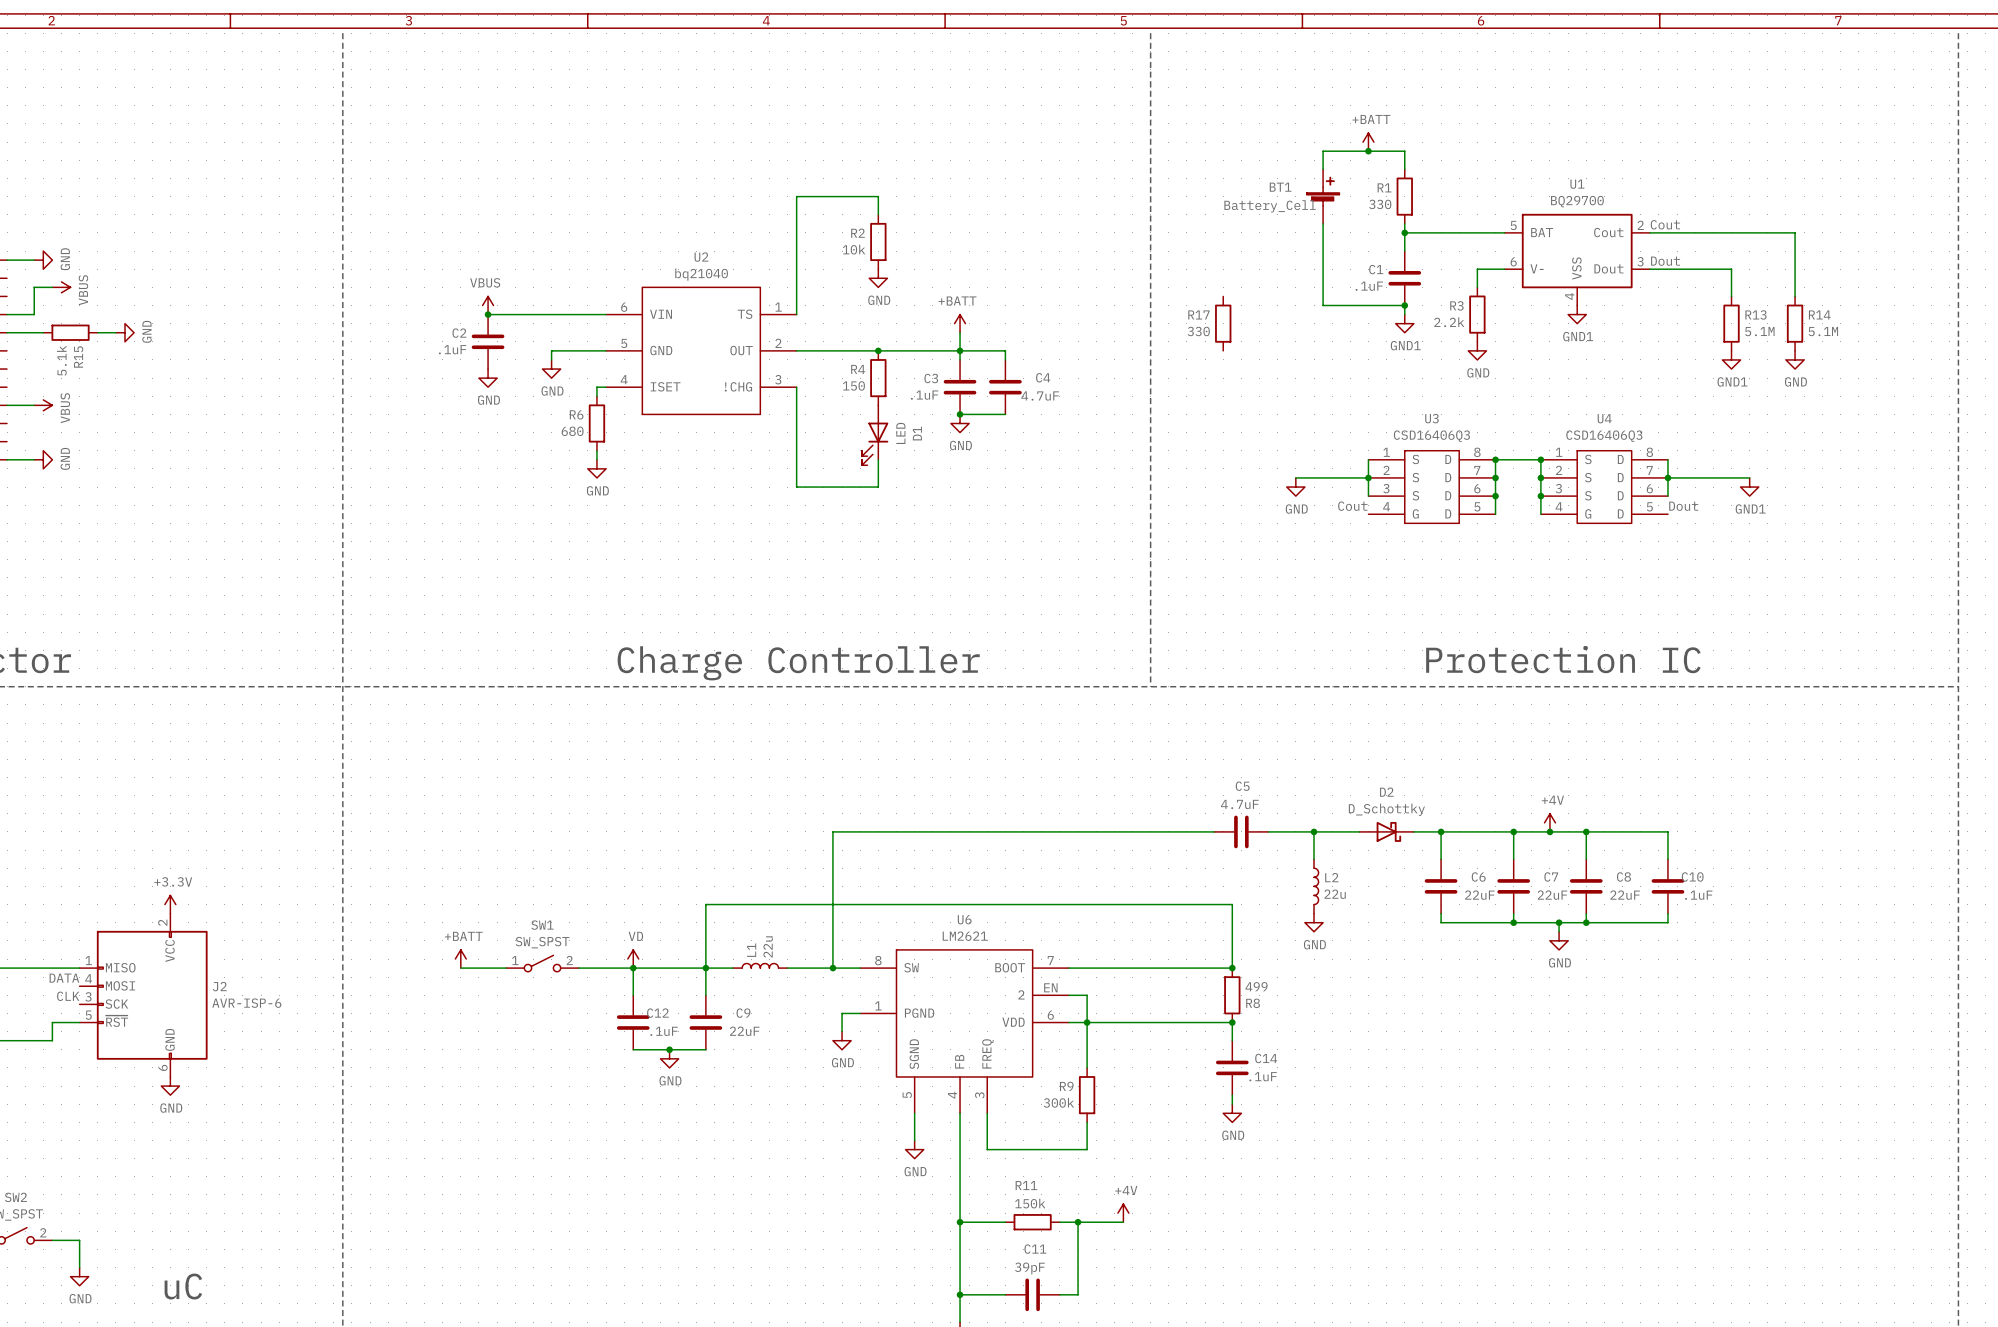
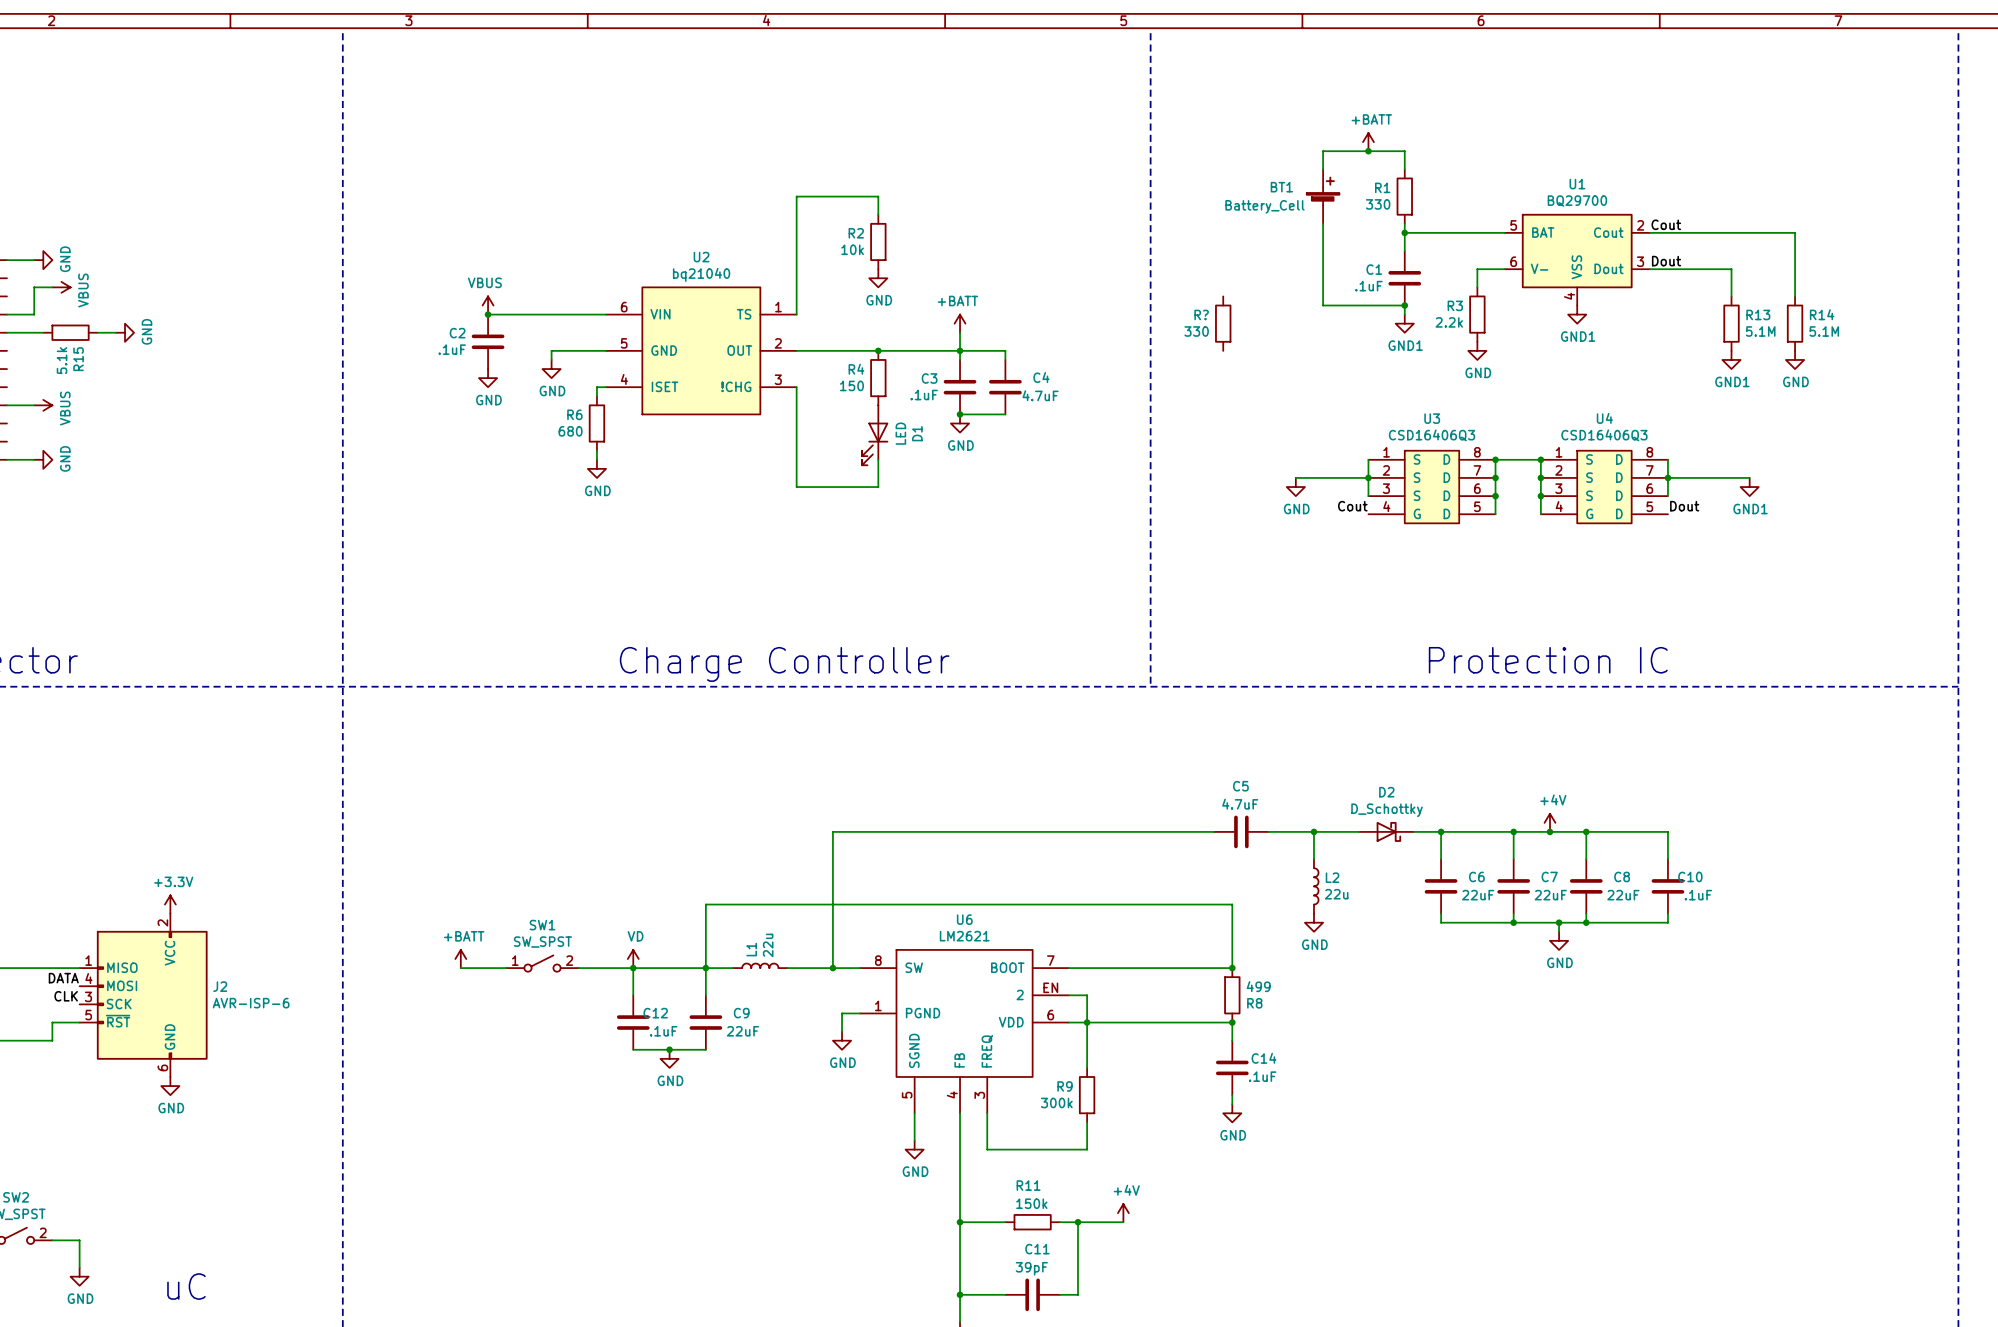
R17 name: R17 (1198, 314) -> R? (1201, 314)

